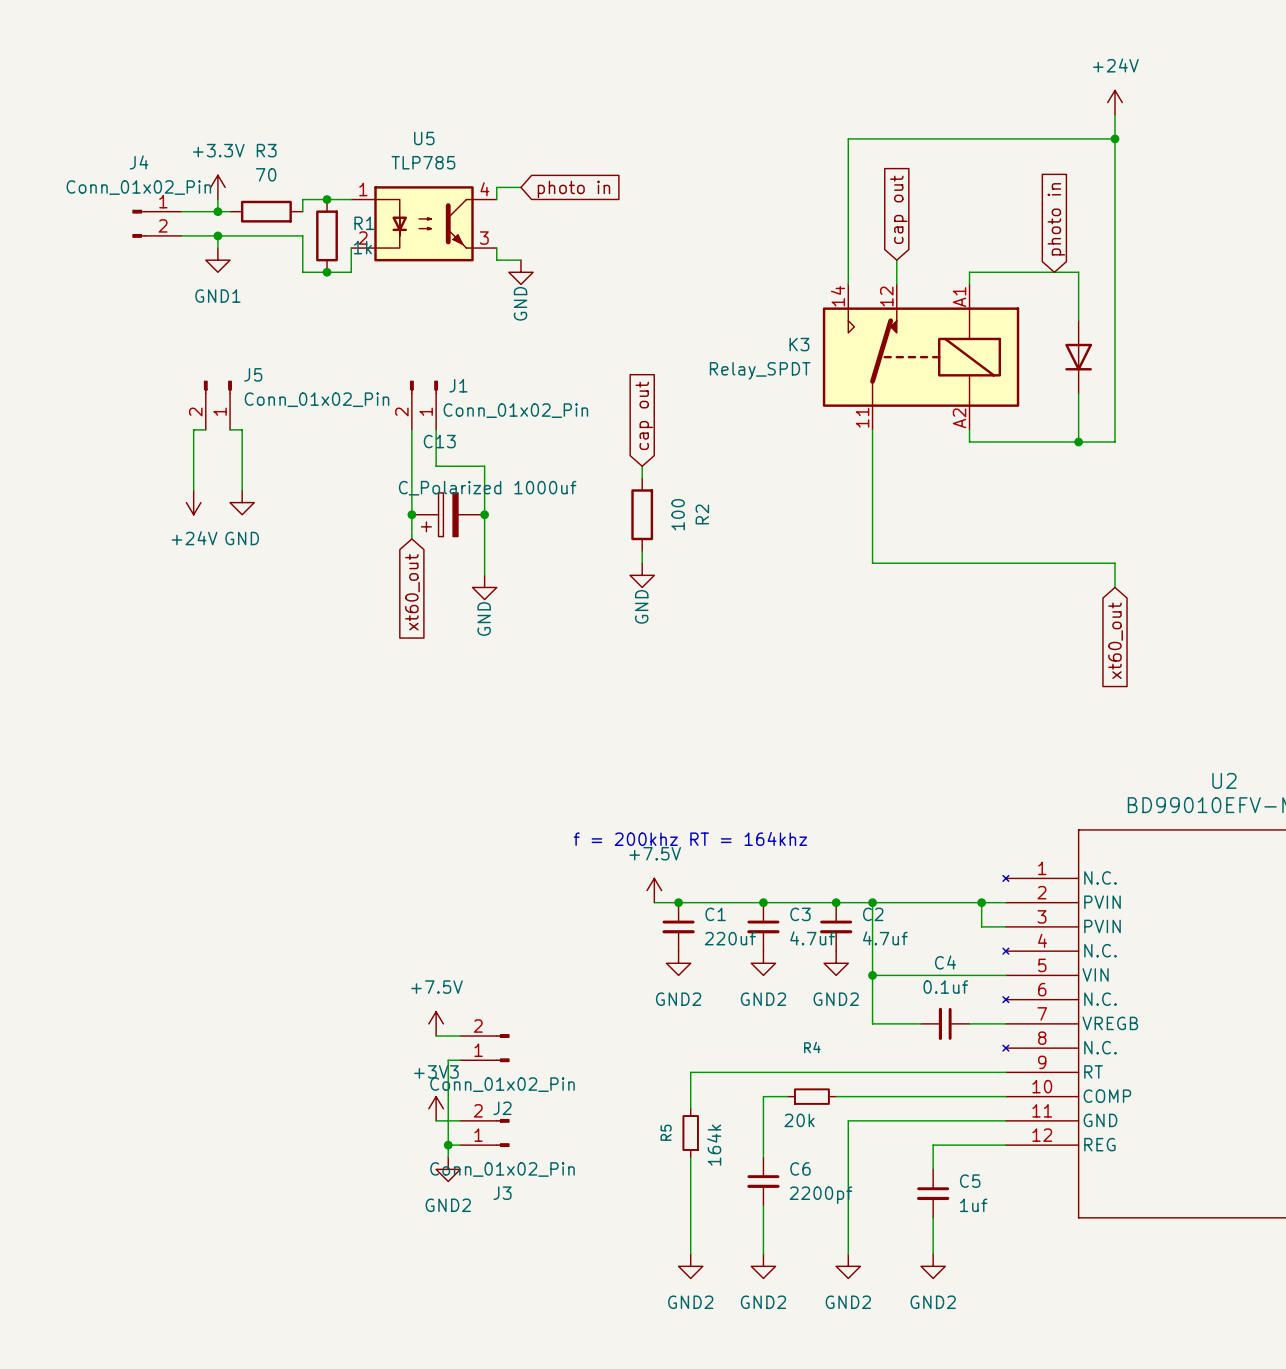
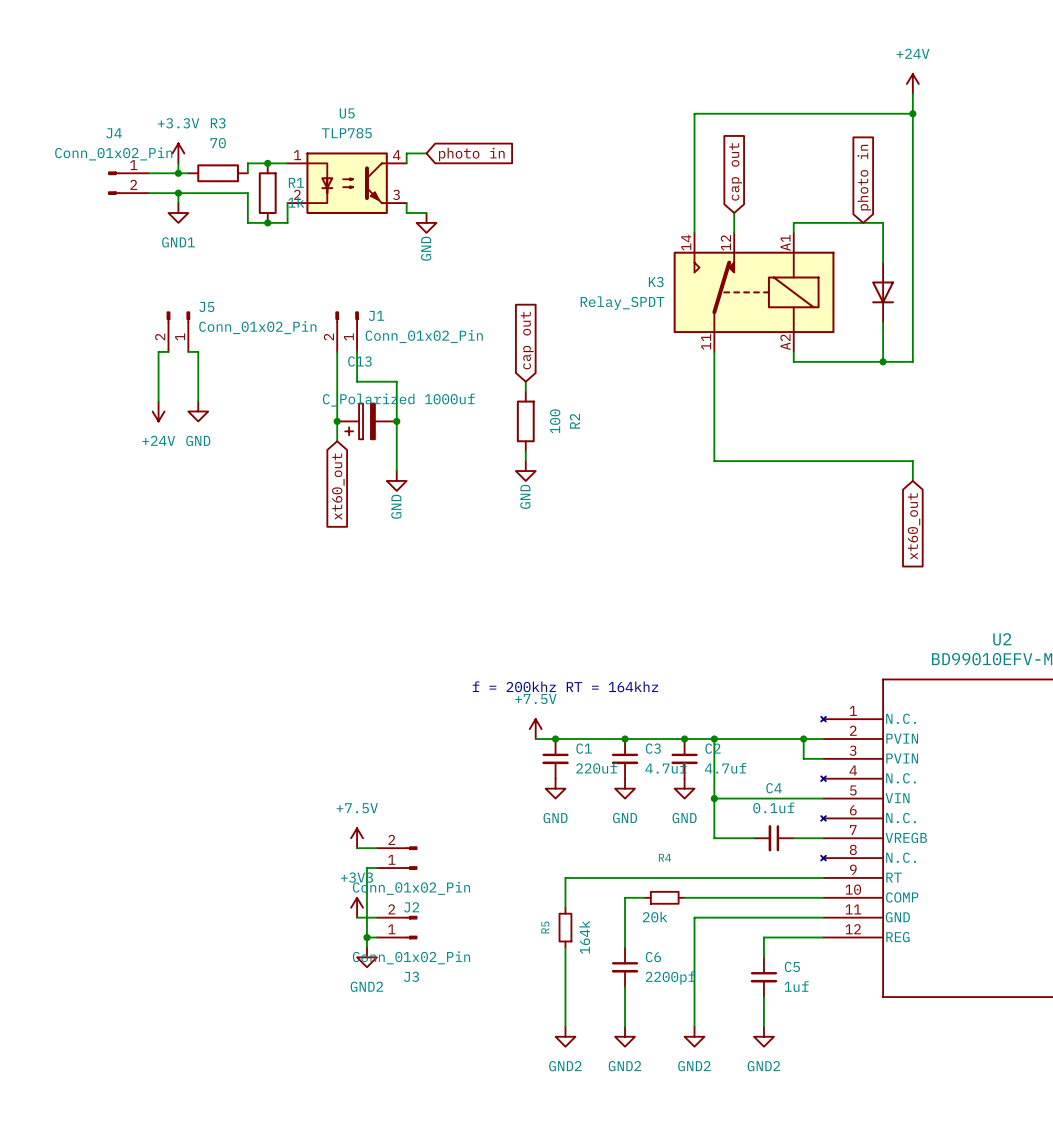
power symbol: GND2 (678, 963) -> GND (555, 788)
power symbol: GND2 (763, 963) -> GND (625, 788)
power symbol: GND2 (836, 963) -> GND (684, 788)

